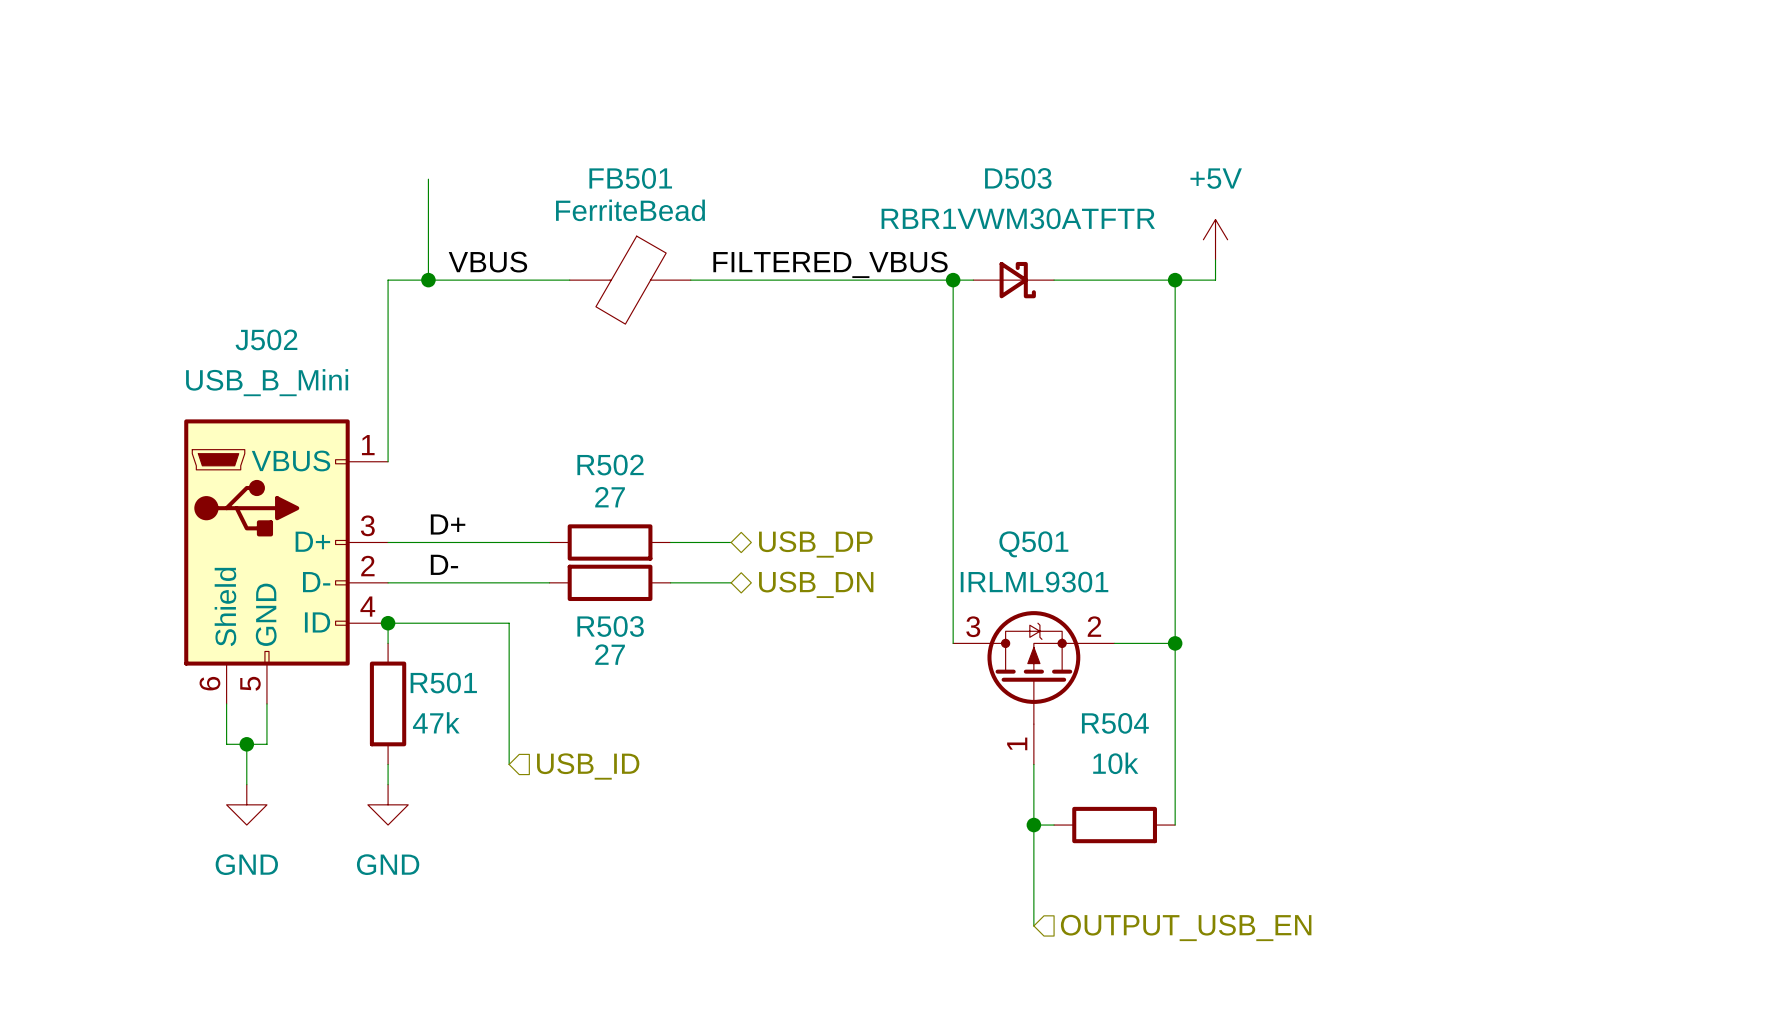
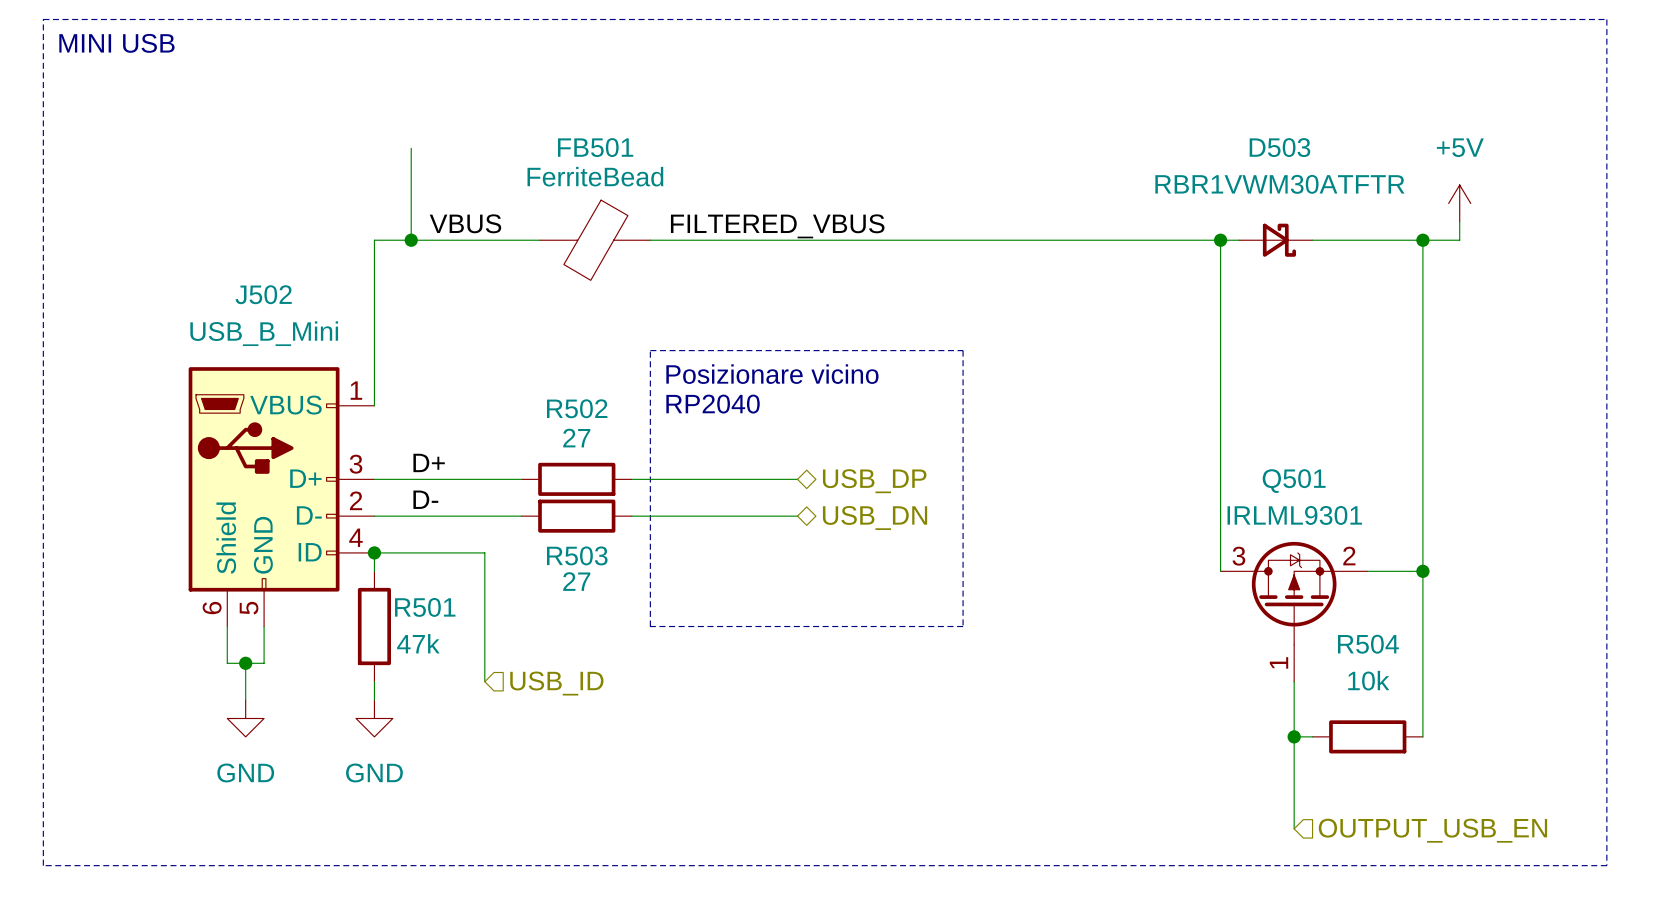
line: none -> (43, 19) (1606, 19) (1606, 865) (43, 865) (43, 19)
text: none -> MINI USB (116, 43)
power symbol position: +5V (1215, 239) -> +5V (1459, 203)
wire: (1215, 259) (1215, 280) -> (1238, 240) (1128, 240)
wire: none -> (1459, 221) (1459, 240) (1312, 240)
wire: (953, 280) (953, 643) -> (1220, 240) (1220, 571)
junction: (953, 280) -> none
D503 position: (1013, 280) -> (1275, 240)
wire: (1175, 280) (1175, 825) -> (1422, 240) (1422, 736)
junction: (1175, 280) -> none
junction: none -> (1220, 240)
junction: none -> (1422, 240)
line: none -> (650, 350) (963, 350) (963, 626) (650, 626) (650, 350)
text: none -> Posizionare vicino (772, 374)
text: none -> RP2040 (713, 404)
wire: none -> (687, 479) (797, 479)
hierarchical label position: USB_DP (815, 544) -> USB_DP (874, 481)
wire: none -> (687, 516) (797, 516)
hierarchical label position: USB_DN (816, 584) -> USB_DN (875, 517)
wire: (1114, 643) (1175, 643) -> (1367, 571) (1422, 571)
junction: (1175, 643) -> none
junction: none -> (1422, 571)
Q501 position: (1033, 687) -> (1294, 611)
wire: (1033, 764) (1033, 925) -> (1294, 681) (1294, 828)
wire: (1033, 825) (1054, 825) -> (1294, 736) (1312, 736)
junction: (1033, 825) -> none
R504 position: (1114, 825) -> (1367, 736)
junction: none -> (1294, 736)
hierarchical label position: OUTPUT_USB_EN (1186, 927) -> OUTPUT_USB_EN (1432, 830)

